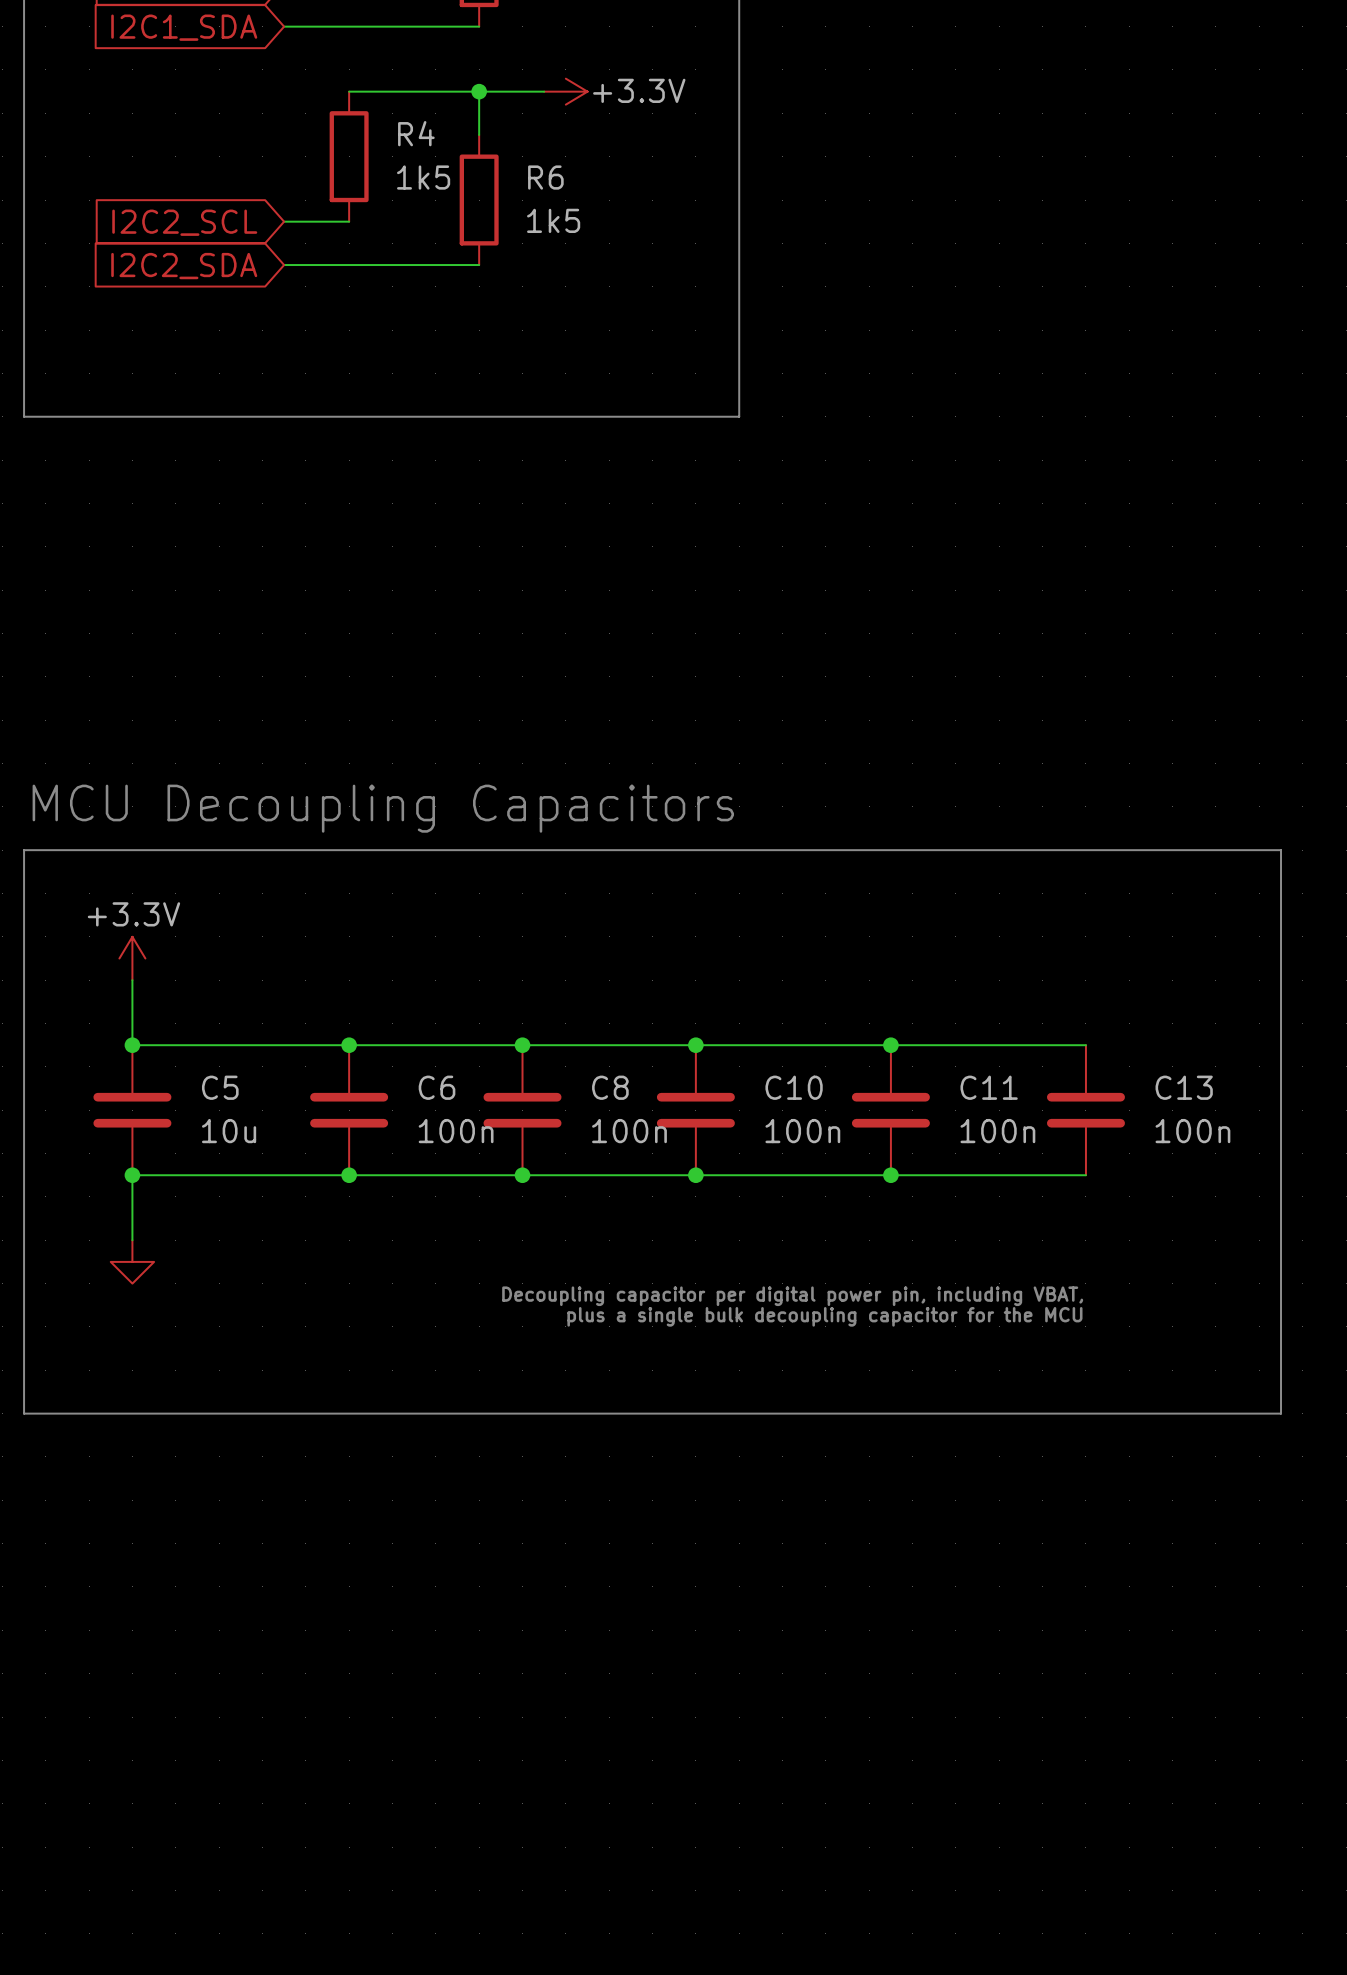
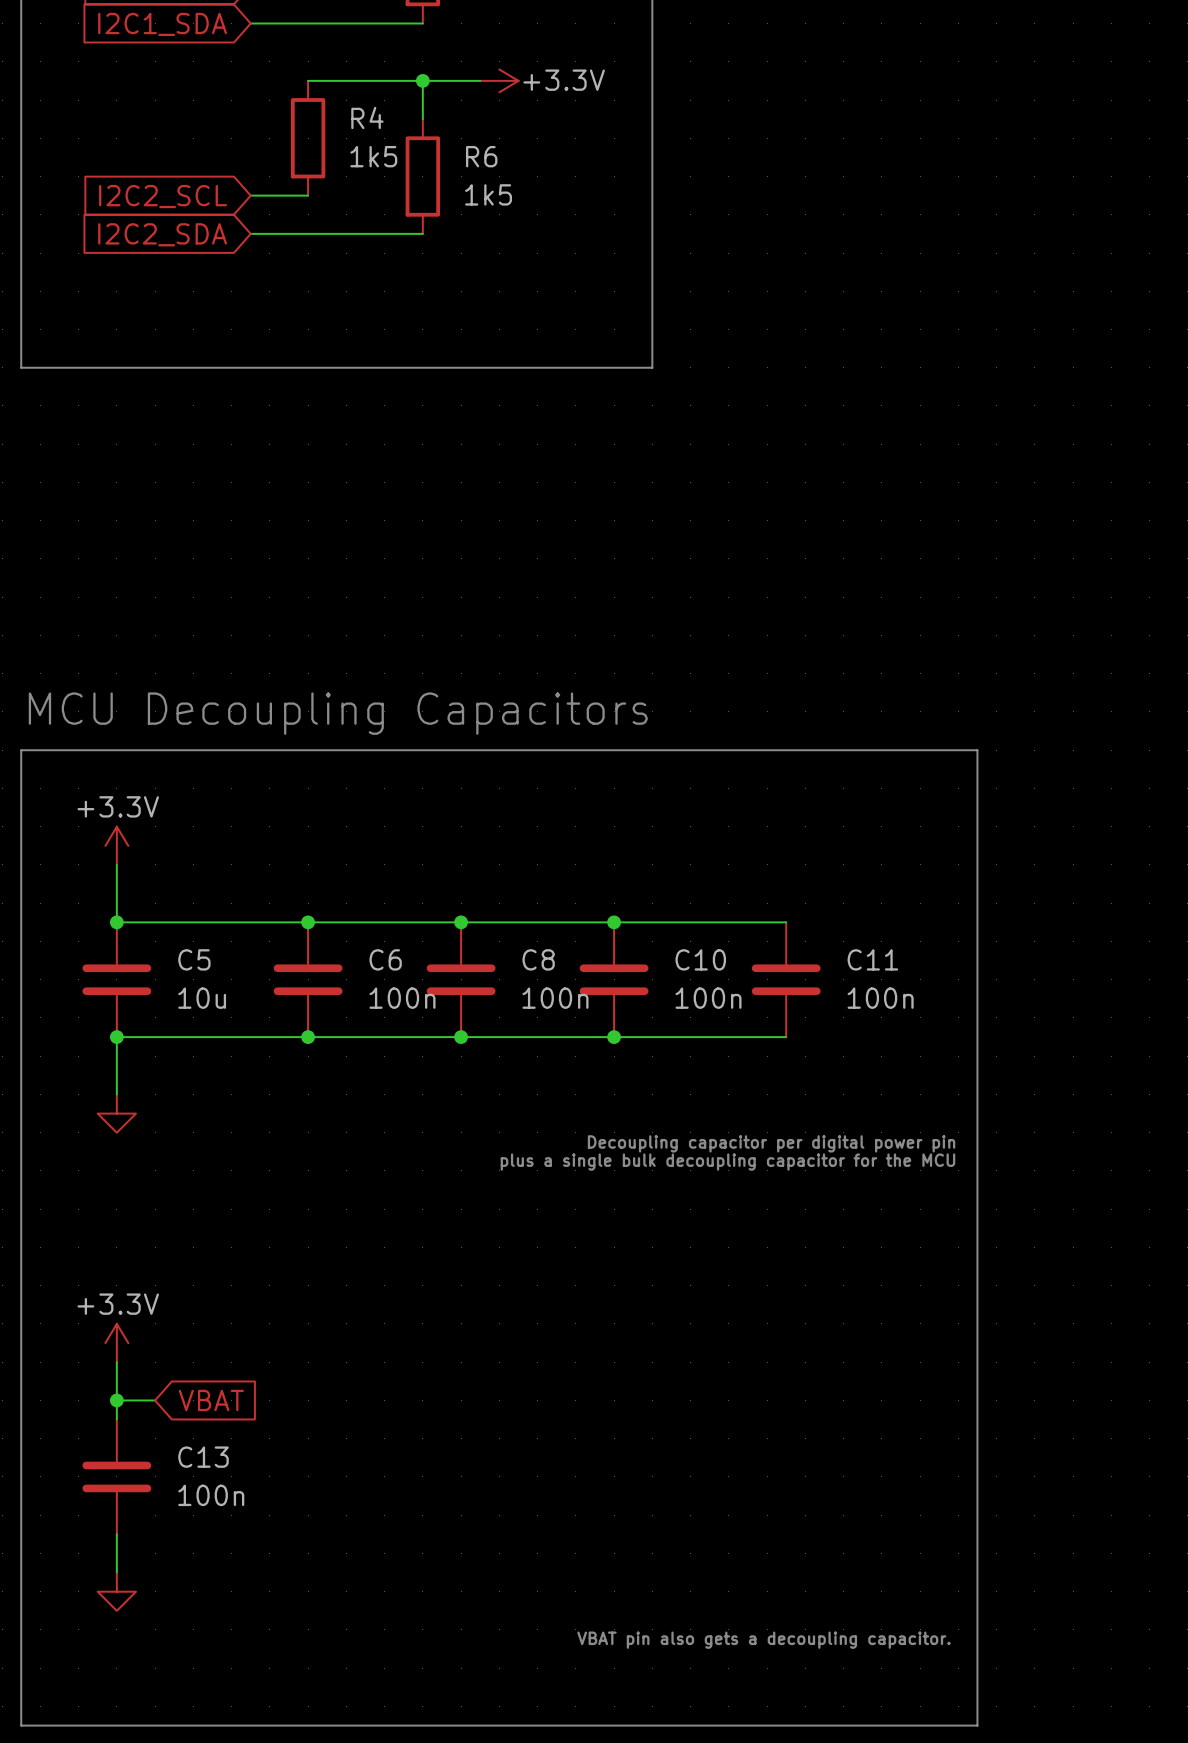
line: (1107, 850) (1281, 850) (1281, 1413) (24, 1413) -> (977, 750) (977, 1725) (21, 1725) (21, 1247)
wire: (890, 1045) (1085, 1045) -> none
junction: (890, 1045) -> none
C13 position: (1085, 1110) -> (116, 1476)
wire: (890, 1175) (1085, 1175) -> none
junction: (890, 1175) -> none
text: Decoupling capacitor per digital power pin, including VBAT, (792, 1296) -> Decoupling capacitor per digital power pin (771, 1143)
power symbol: none -> +3.3V (116, 1343)
wire: none -> (116, 1362) (116, 1419)
wire: none -> (116, 1400) (155, 1400)
junction: none -> (116, 1400)
global label: none -> VBAT (211, 1400)
wire: none -> (116, 1534) (116, 1572)
power symbol: none -> (116, 1591)
text: none -> VBAT pin also gets a decoupling capacitor. (763, 1640)

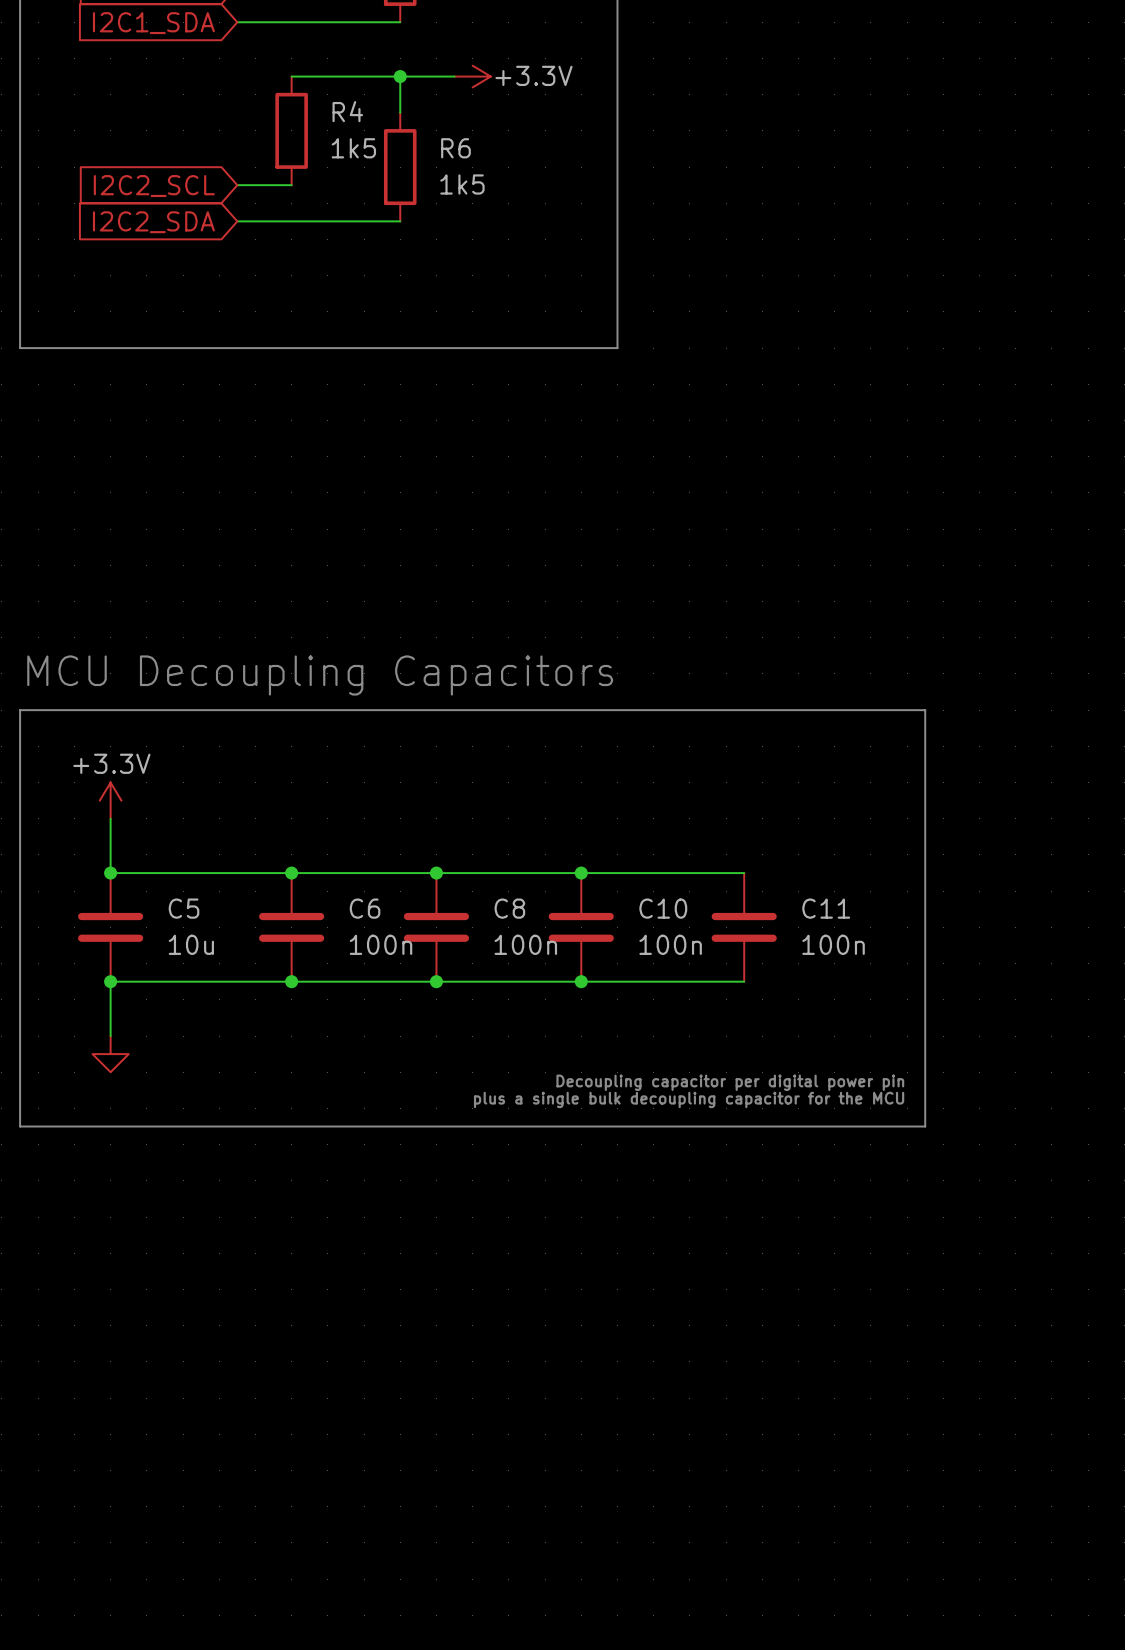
line: (21, 1190) (21, 1725) (977, 1725) (977, 1190) -> (20, 1126) (925, 1126)
power symbol: +3.3V (116, 1343) -> none
wire: (116, 1362) (116, 1419) -> none
wire: (116, 1400) (155, 1400) -> none
junction: (116, 1400) -> none
global label: VBAT (211, 1400) -> none
C13: 100n (116, 1476) -> none
wire: (116, 1534) (116, 1572) -> none
power symbol: (116, 1591) -> none
text: VBAT pin also gets a decoupling capacitor. (763, 1640) -> none

